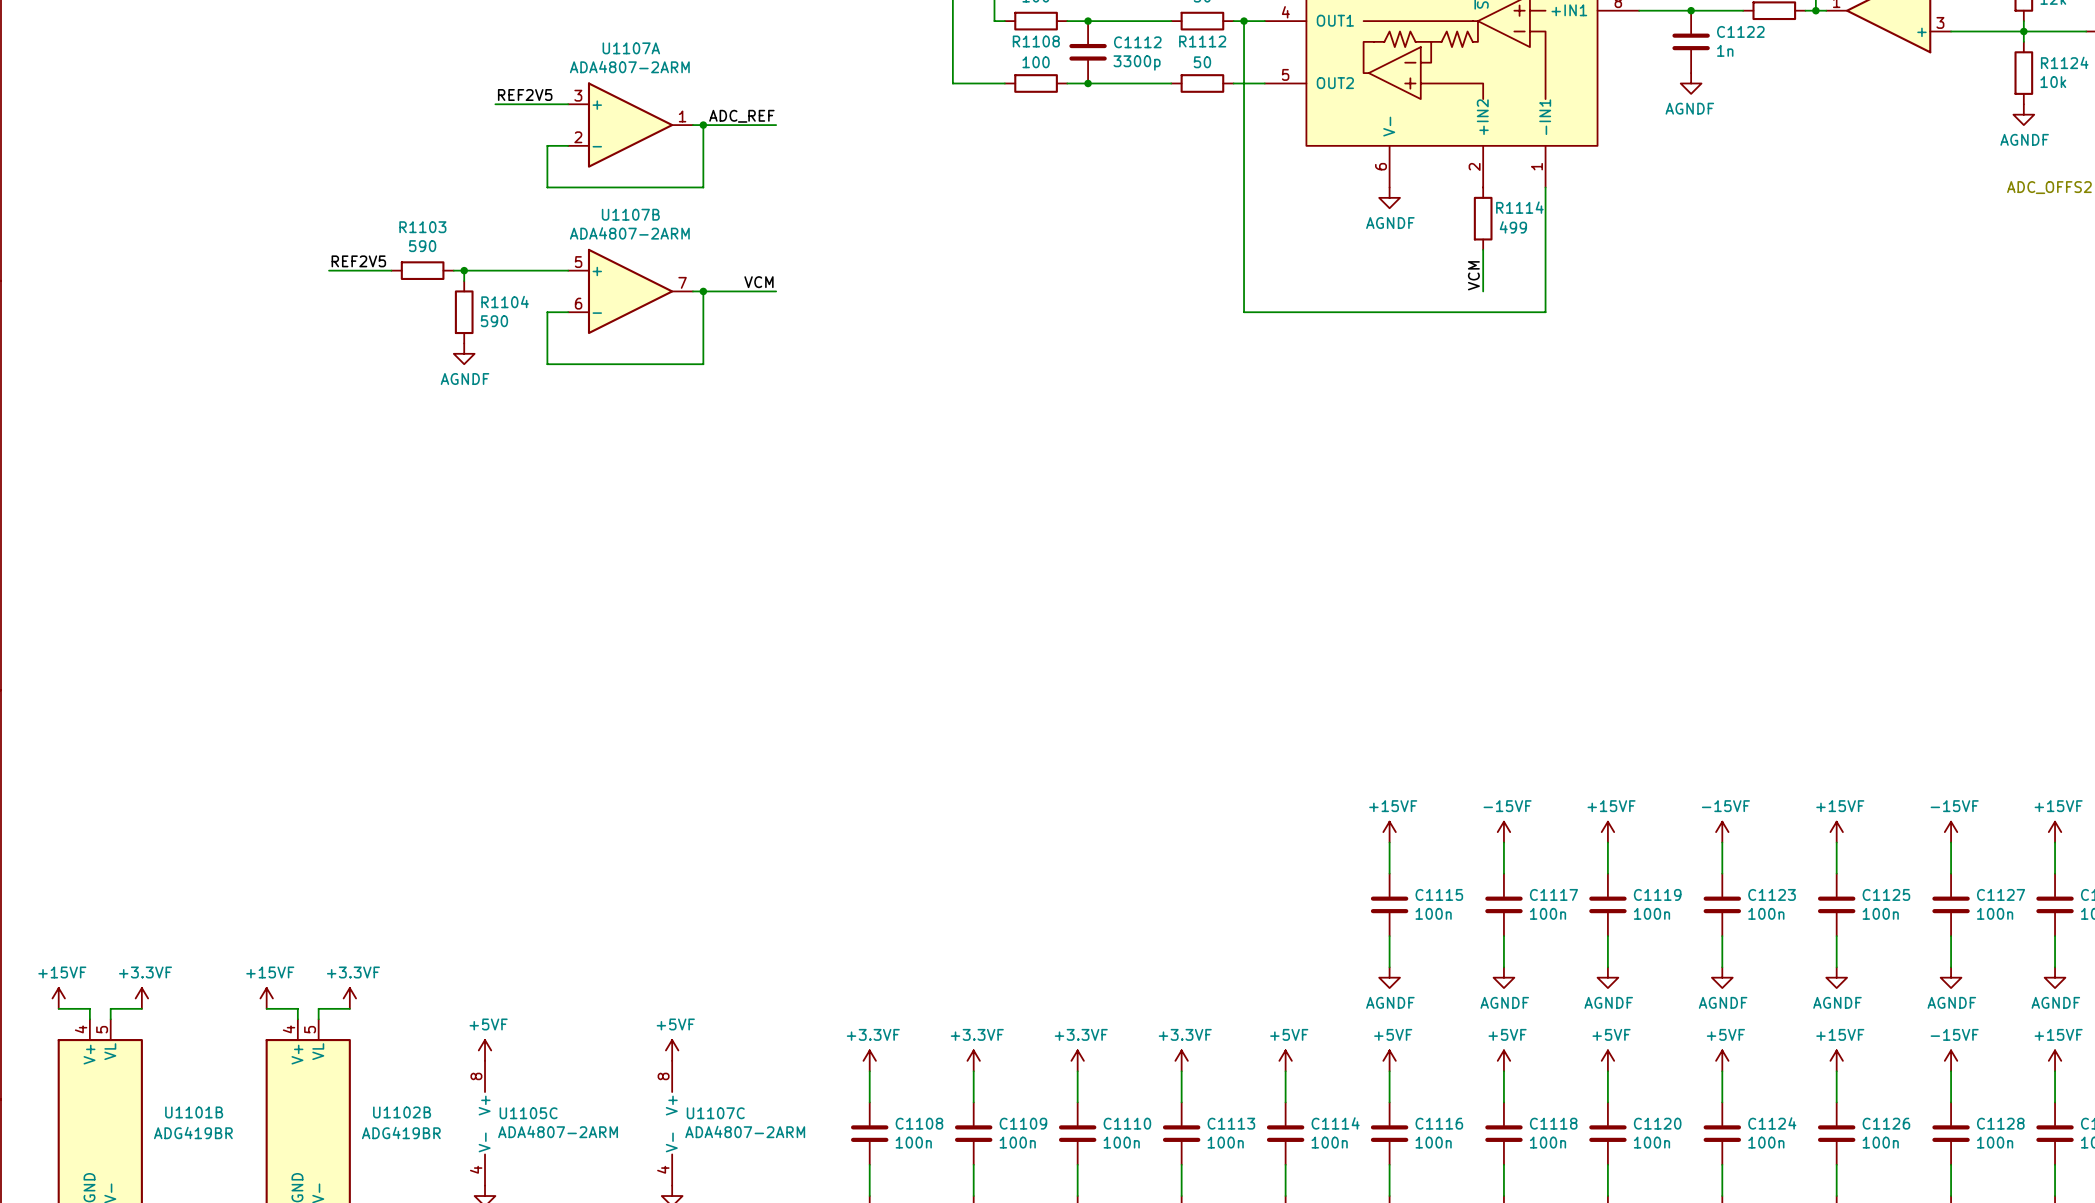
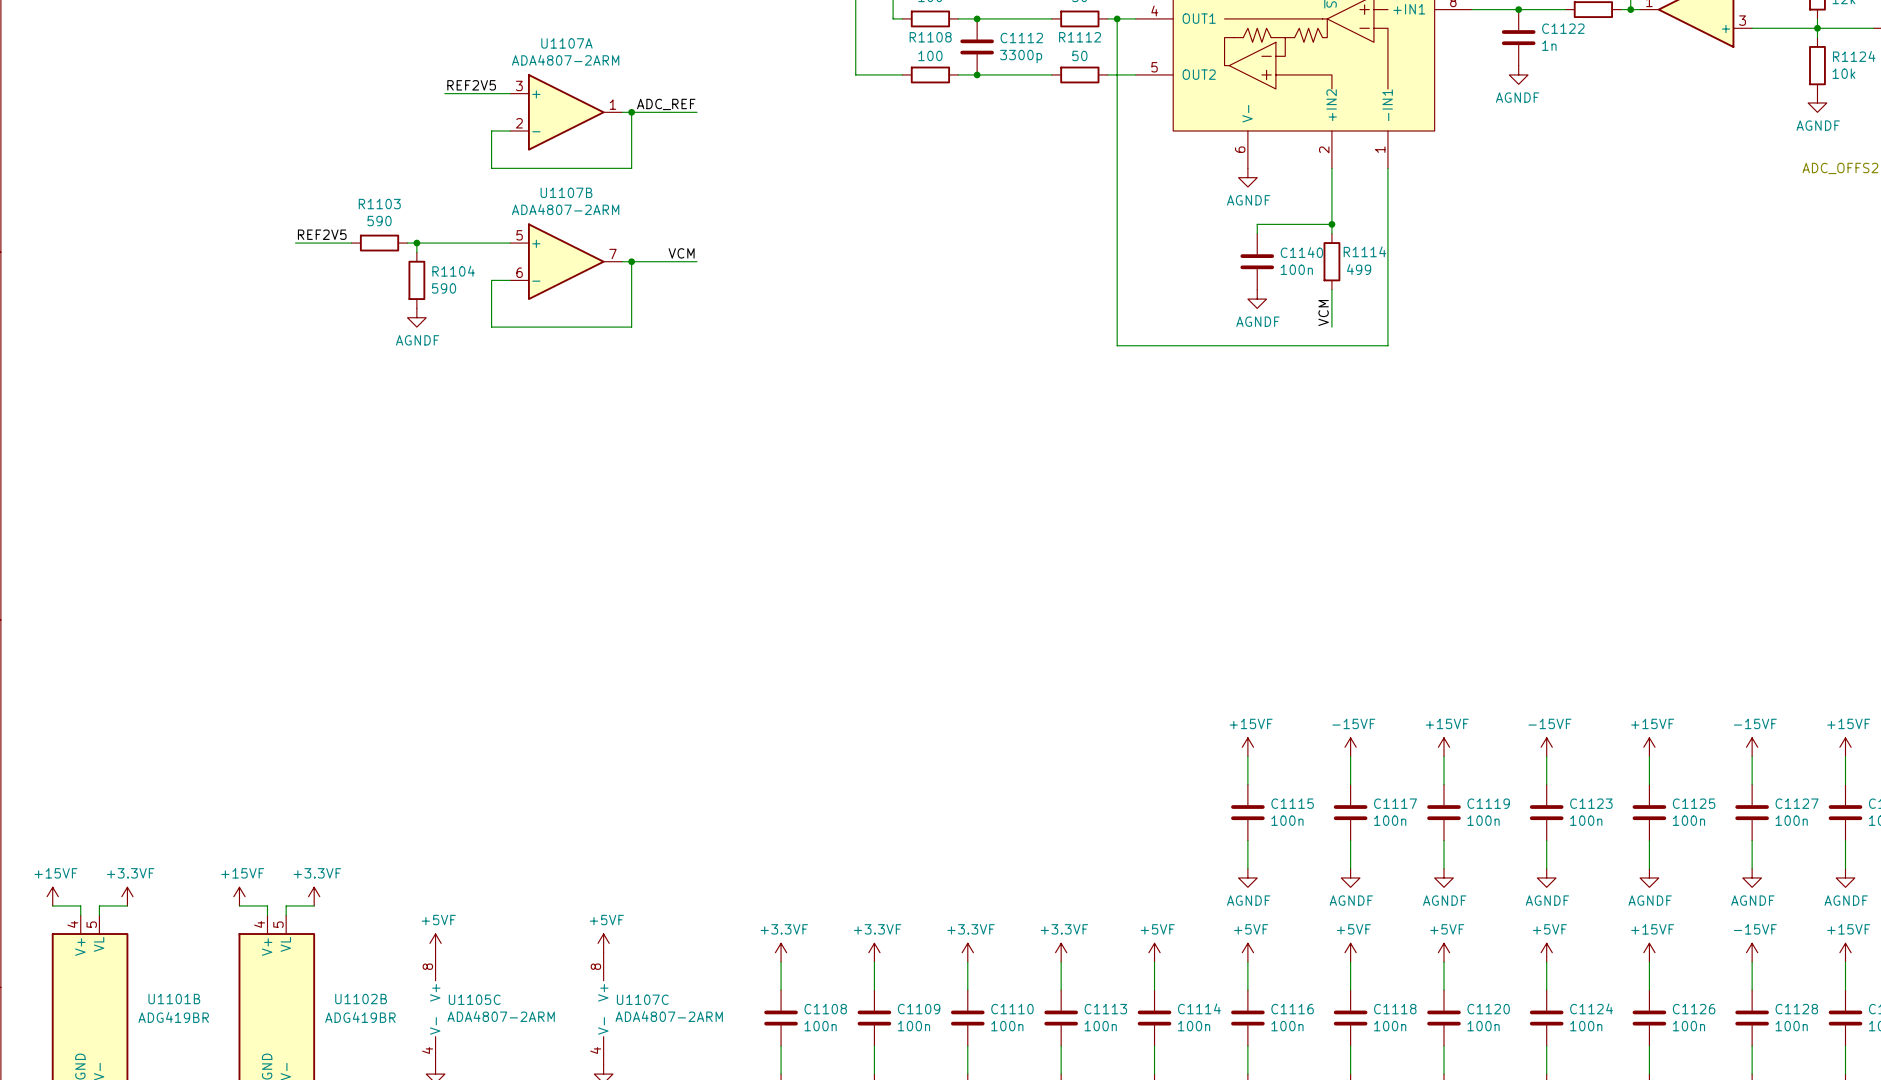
wire: none -> (1331, 168) (1331, 224) (1257, 224) (1257, 233)
R1114 position: (1483, 218) -> (1331, 261)
junction: none -> (1331, 224)
wire: (1483, 260) (1483, 291) -> none
label position: VCM (1473, 275) -> VCM (1323, 313)
C1140: none -> 100n (1257, 261)
wire: (1244, 312) (1545, 312) -> (1117, 280) (1117, 345) (1387, 345) (1387, 280)
wire: none -> (1331, 289) (1331, 327)
power symbol: none -> AGNDF (1257, 299)

